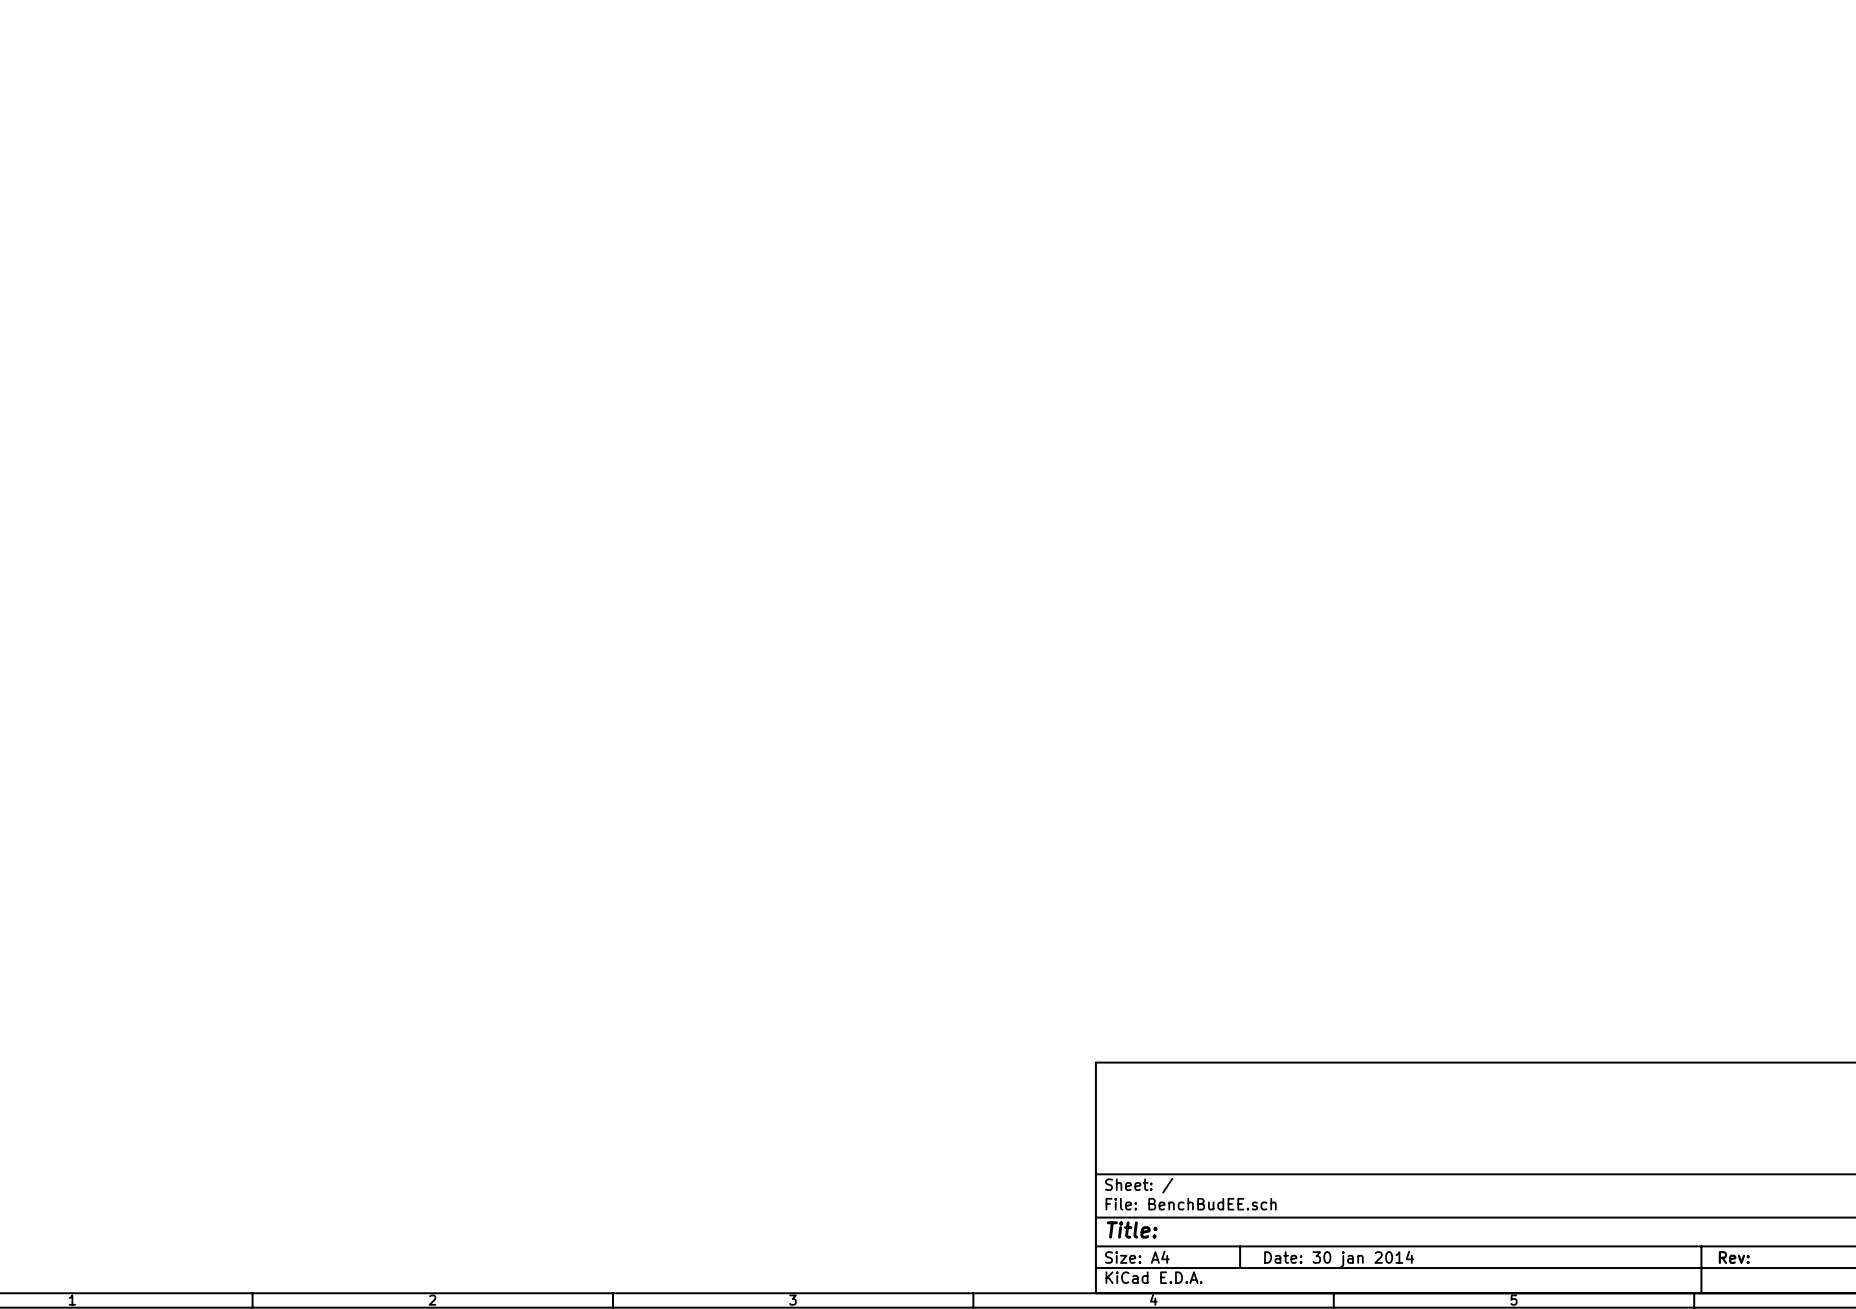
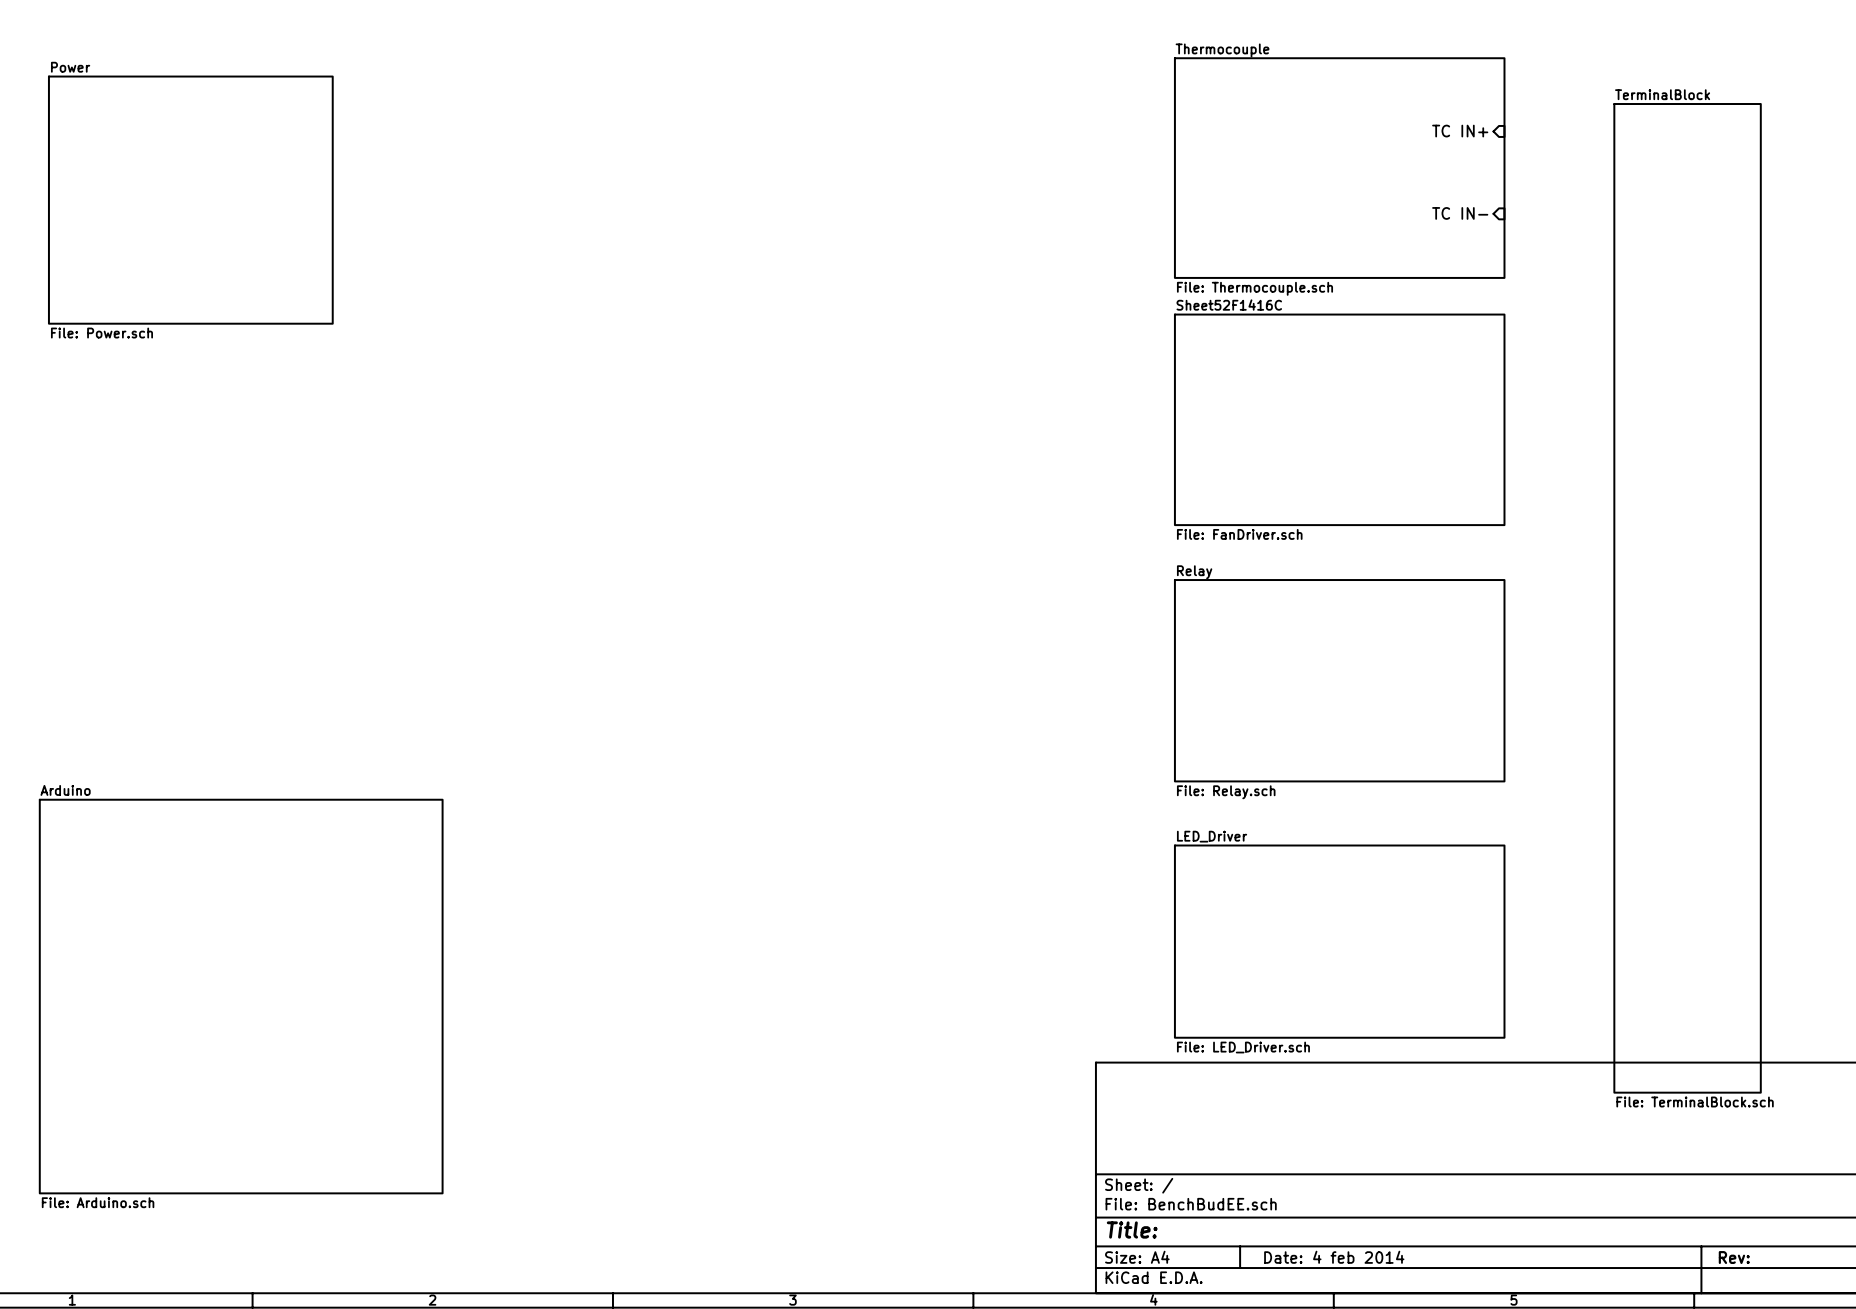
sheet pin: none -> TC IN+ (1460, 131)
sheet Thermocouple: none -> File: Thermocouple.sch (1339, 168)
sheet Power: none -> File: Power.sch (190, 200)
sheet pin: none -> TC IN- (1460, 213)
sheet Sheet52F1416C: none -> File: FanDriver.sch (1339, 419)
sheet TerminalBlock: none -> File: TerminalBlock.sch (1687, 598)
sheet Relay: none -> File: Relay.sch (1339, 680)
sheet LED_Driver: none -> File: LED_Driver.sch (1339, 941)
sheet Arduino: none -> File: Arduino.sch (241, 996)
title block: Date: 30 jan 2014 (1339, 1259) -> Date: 4 feb 2014 (1334, 1257)

